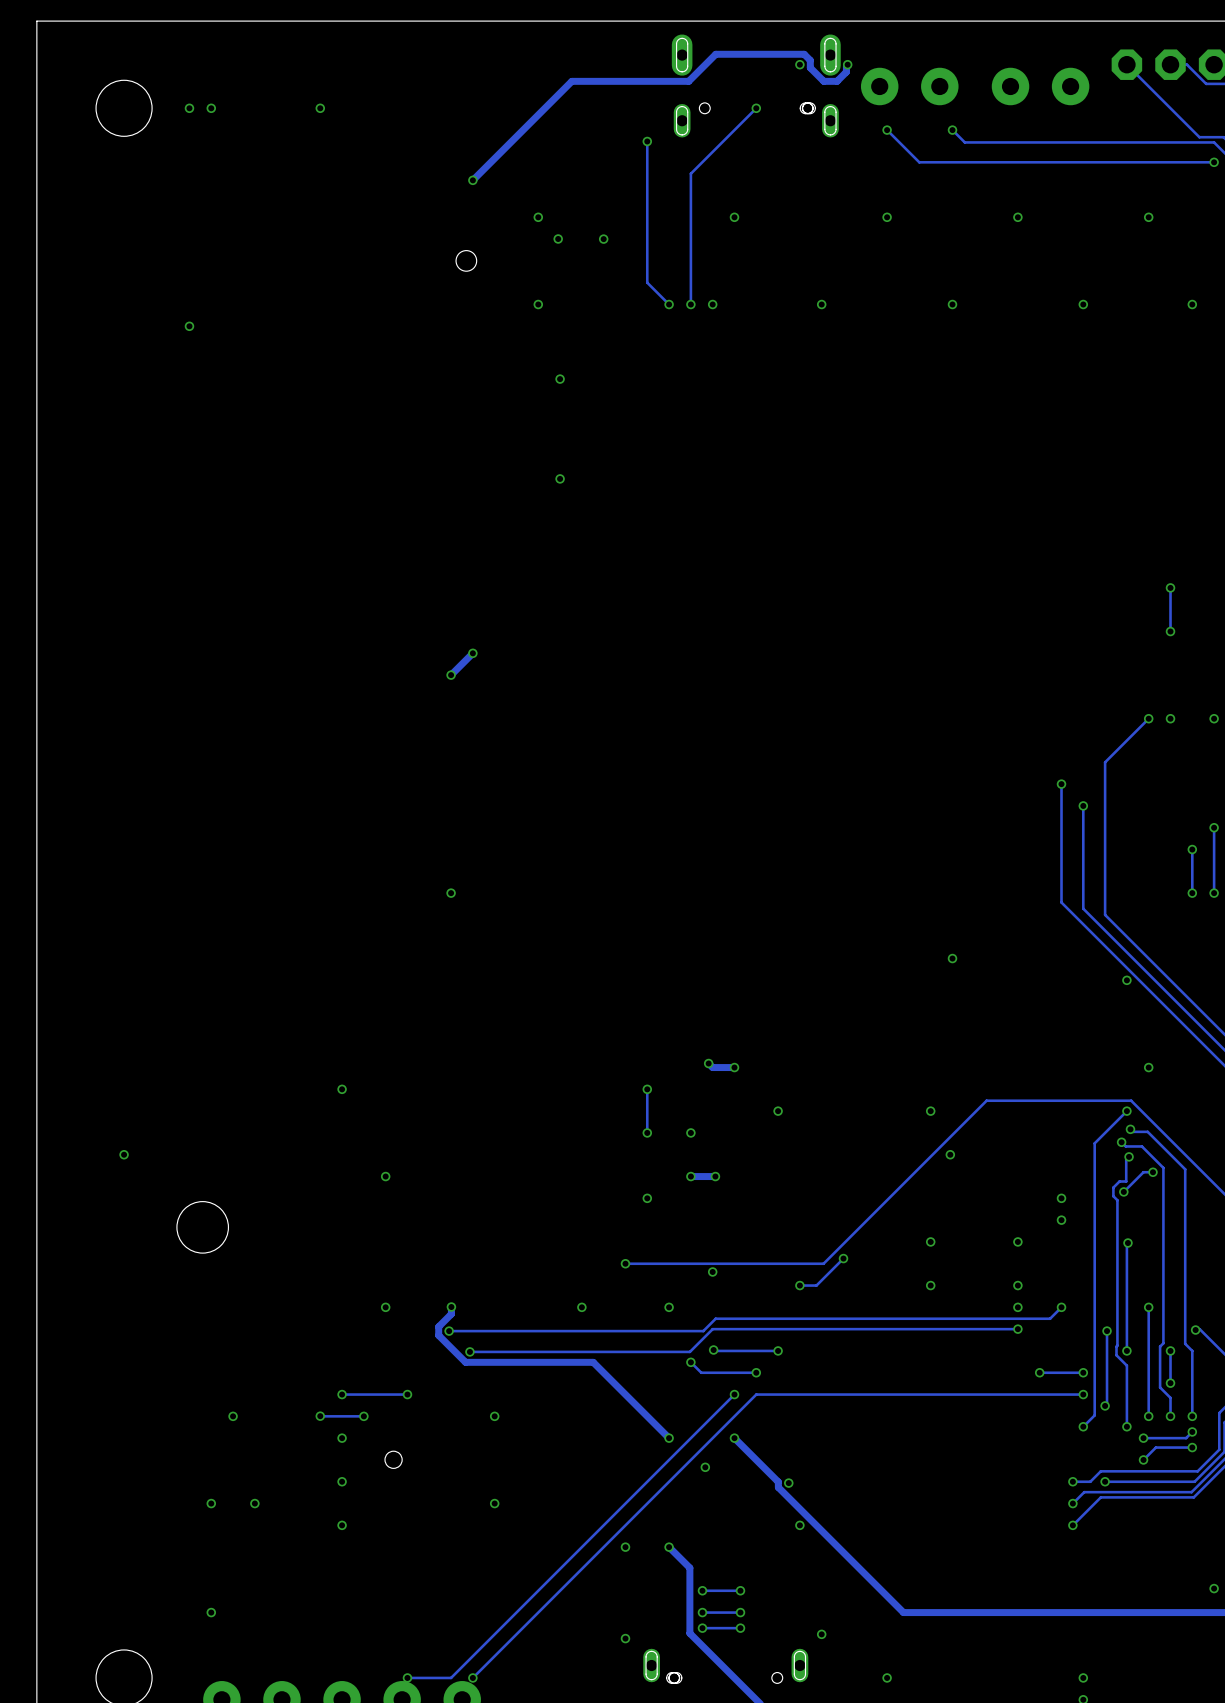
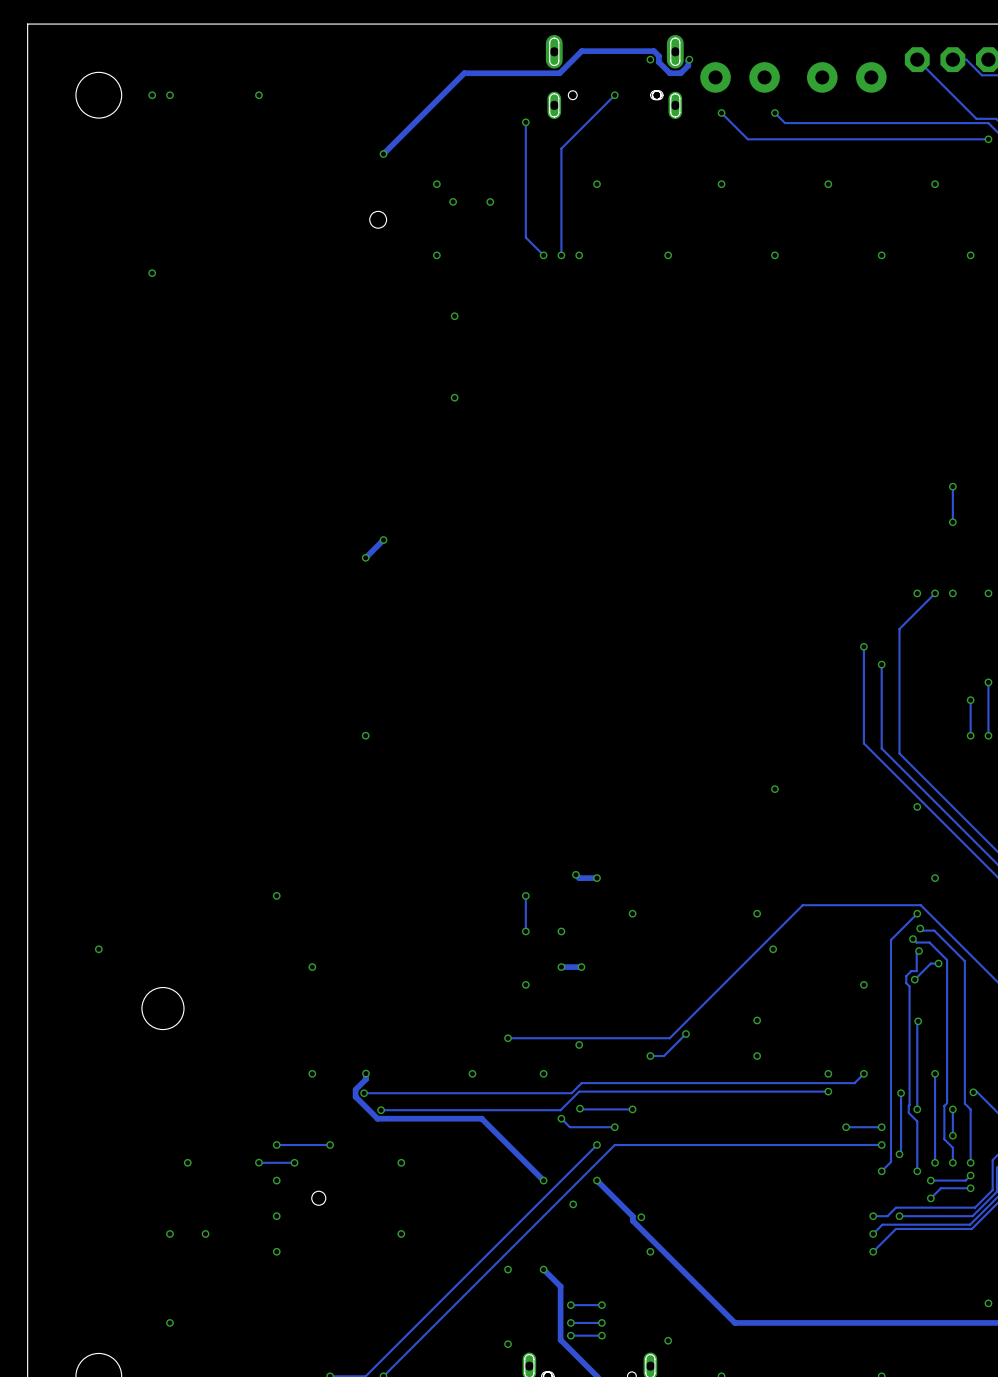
via: none -> (917, 593)
via: (1061, 1220) -> none
via: (1017, 1241) -> none
via: (1017, 1285) -> none

